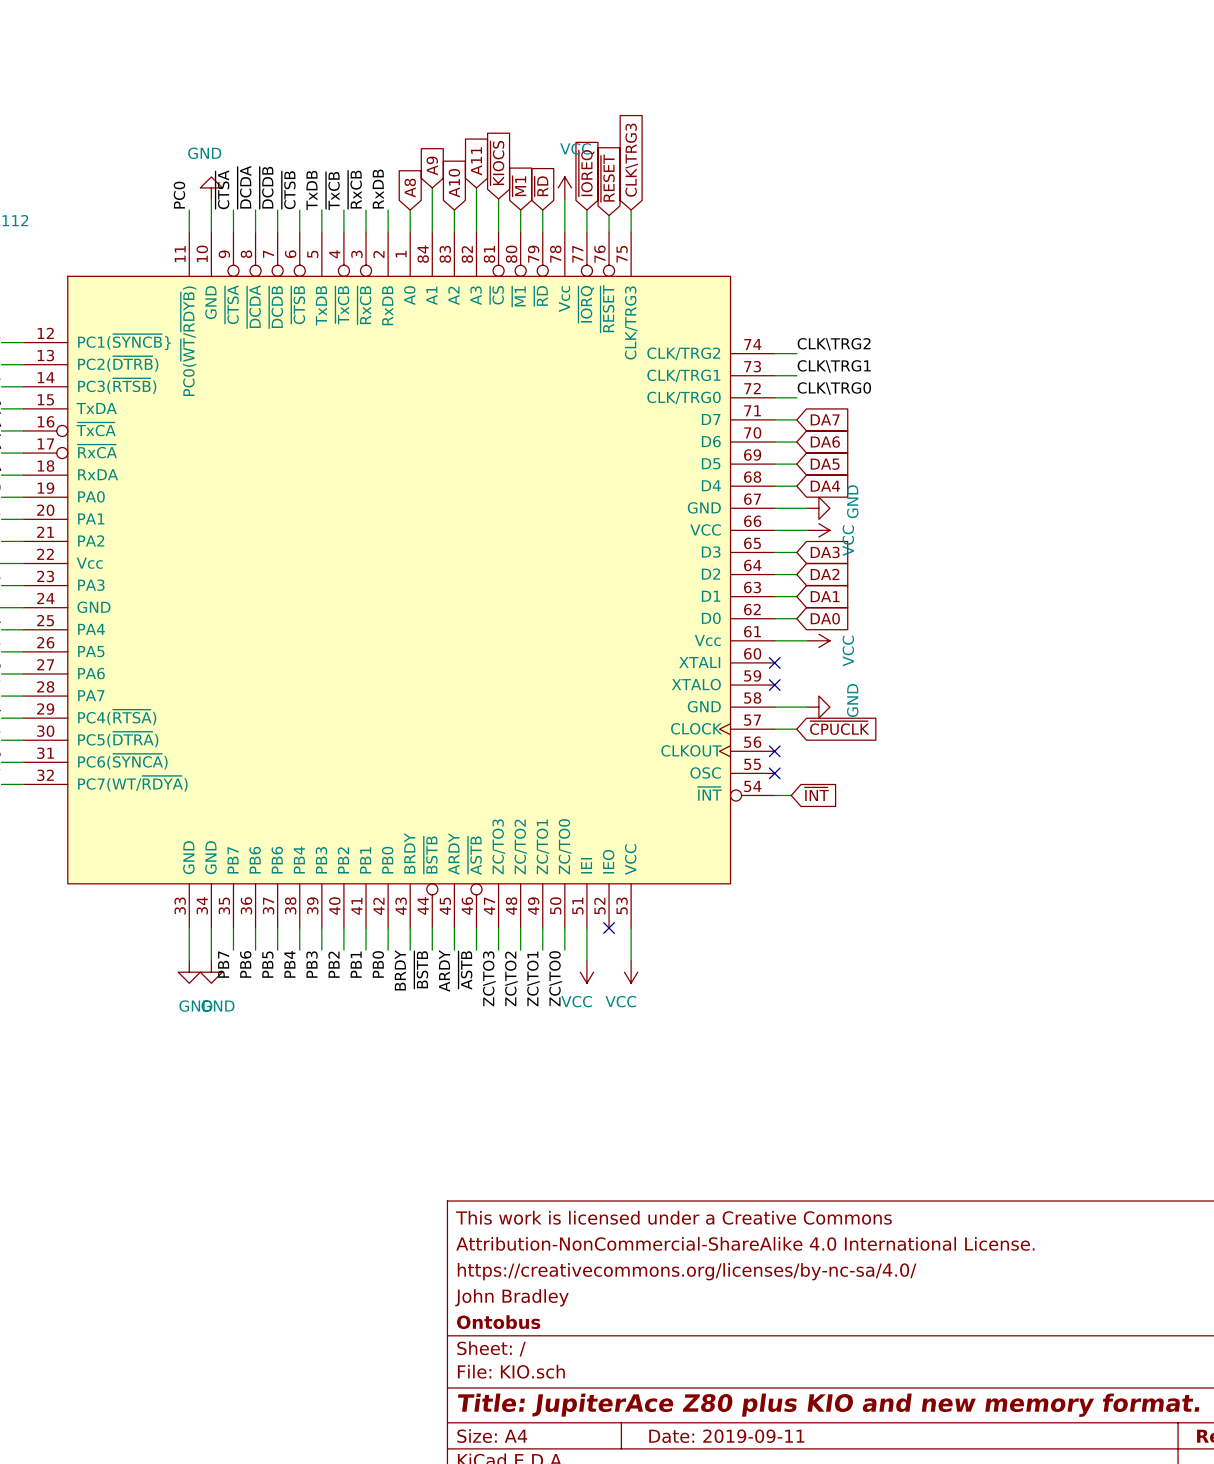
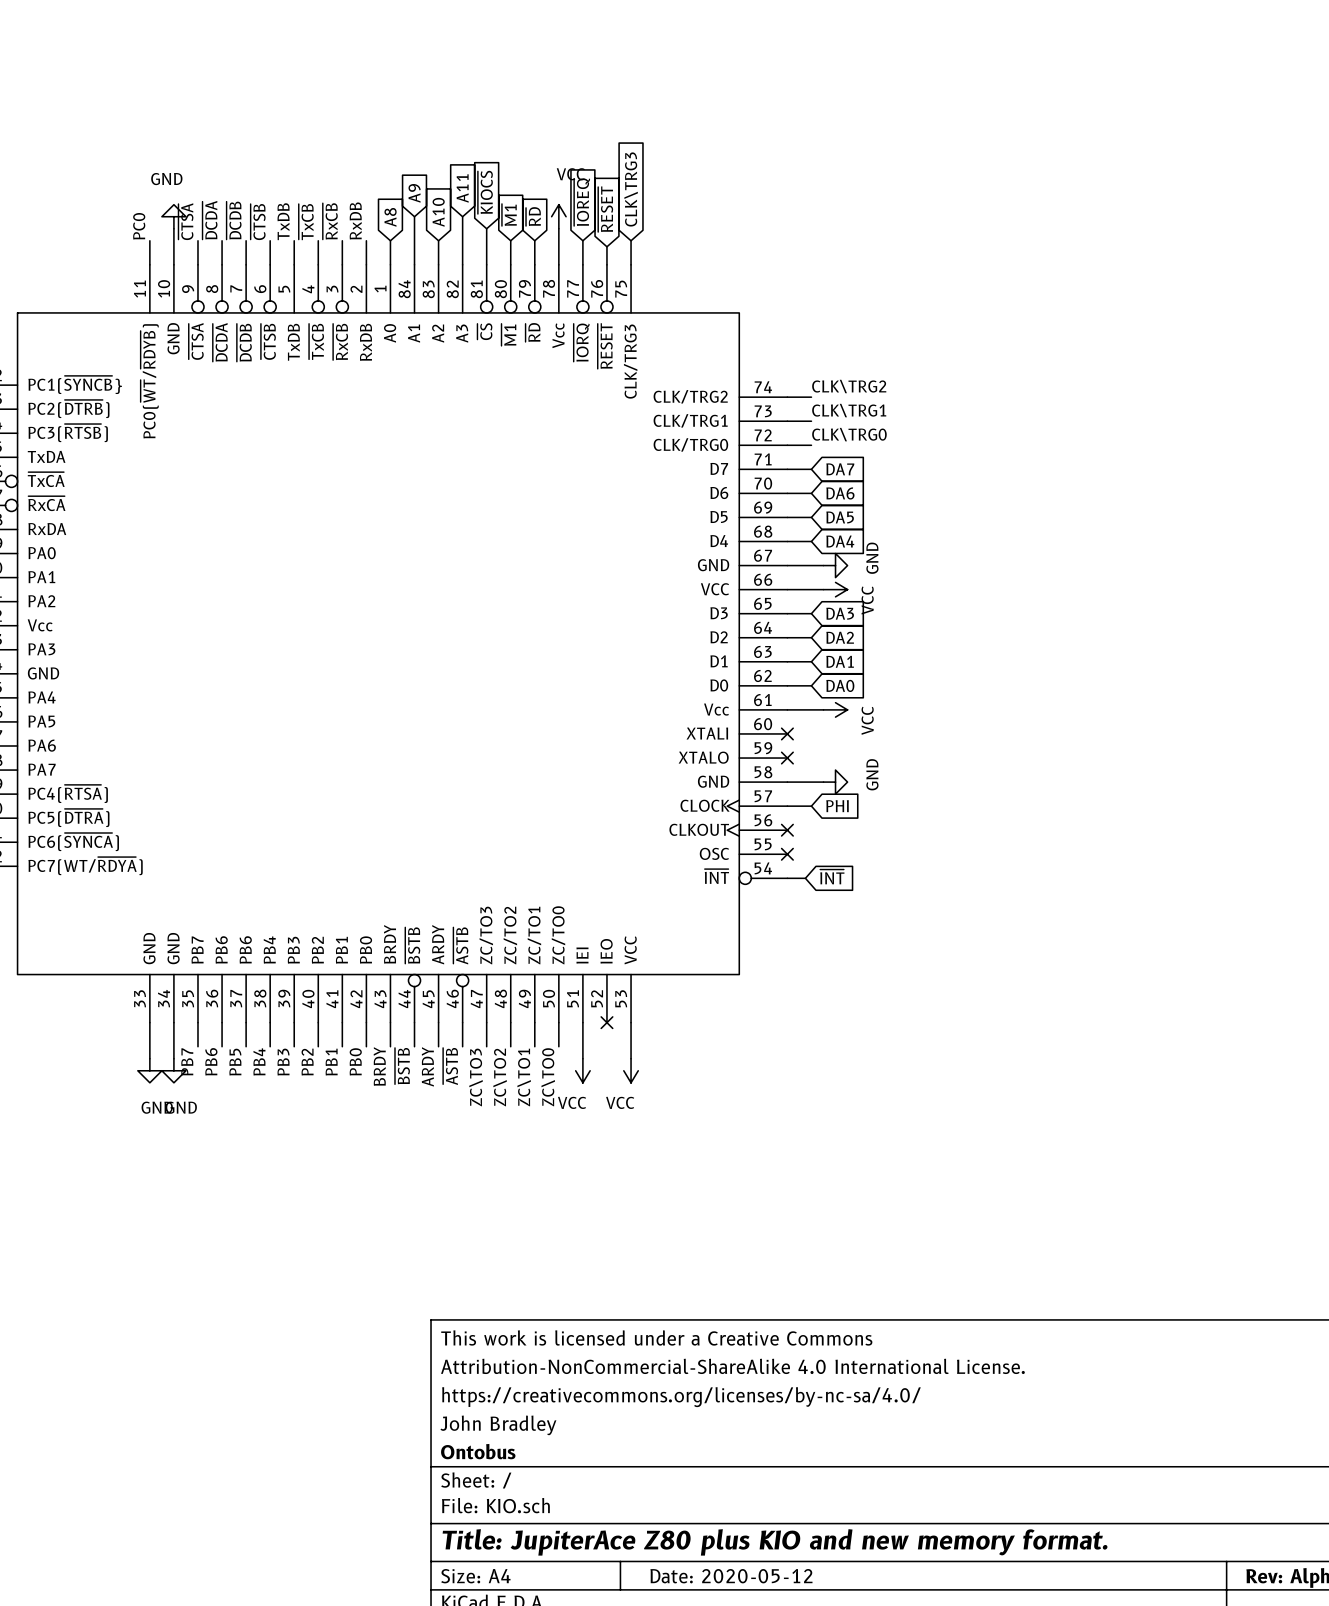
global label: ~{CPUCLK} (839, 728) -> PHI (837, 806)
title block: Date: 2019-09-11 (726, 1436) -> Date: 2020-05-12 (731, 1576)

